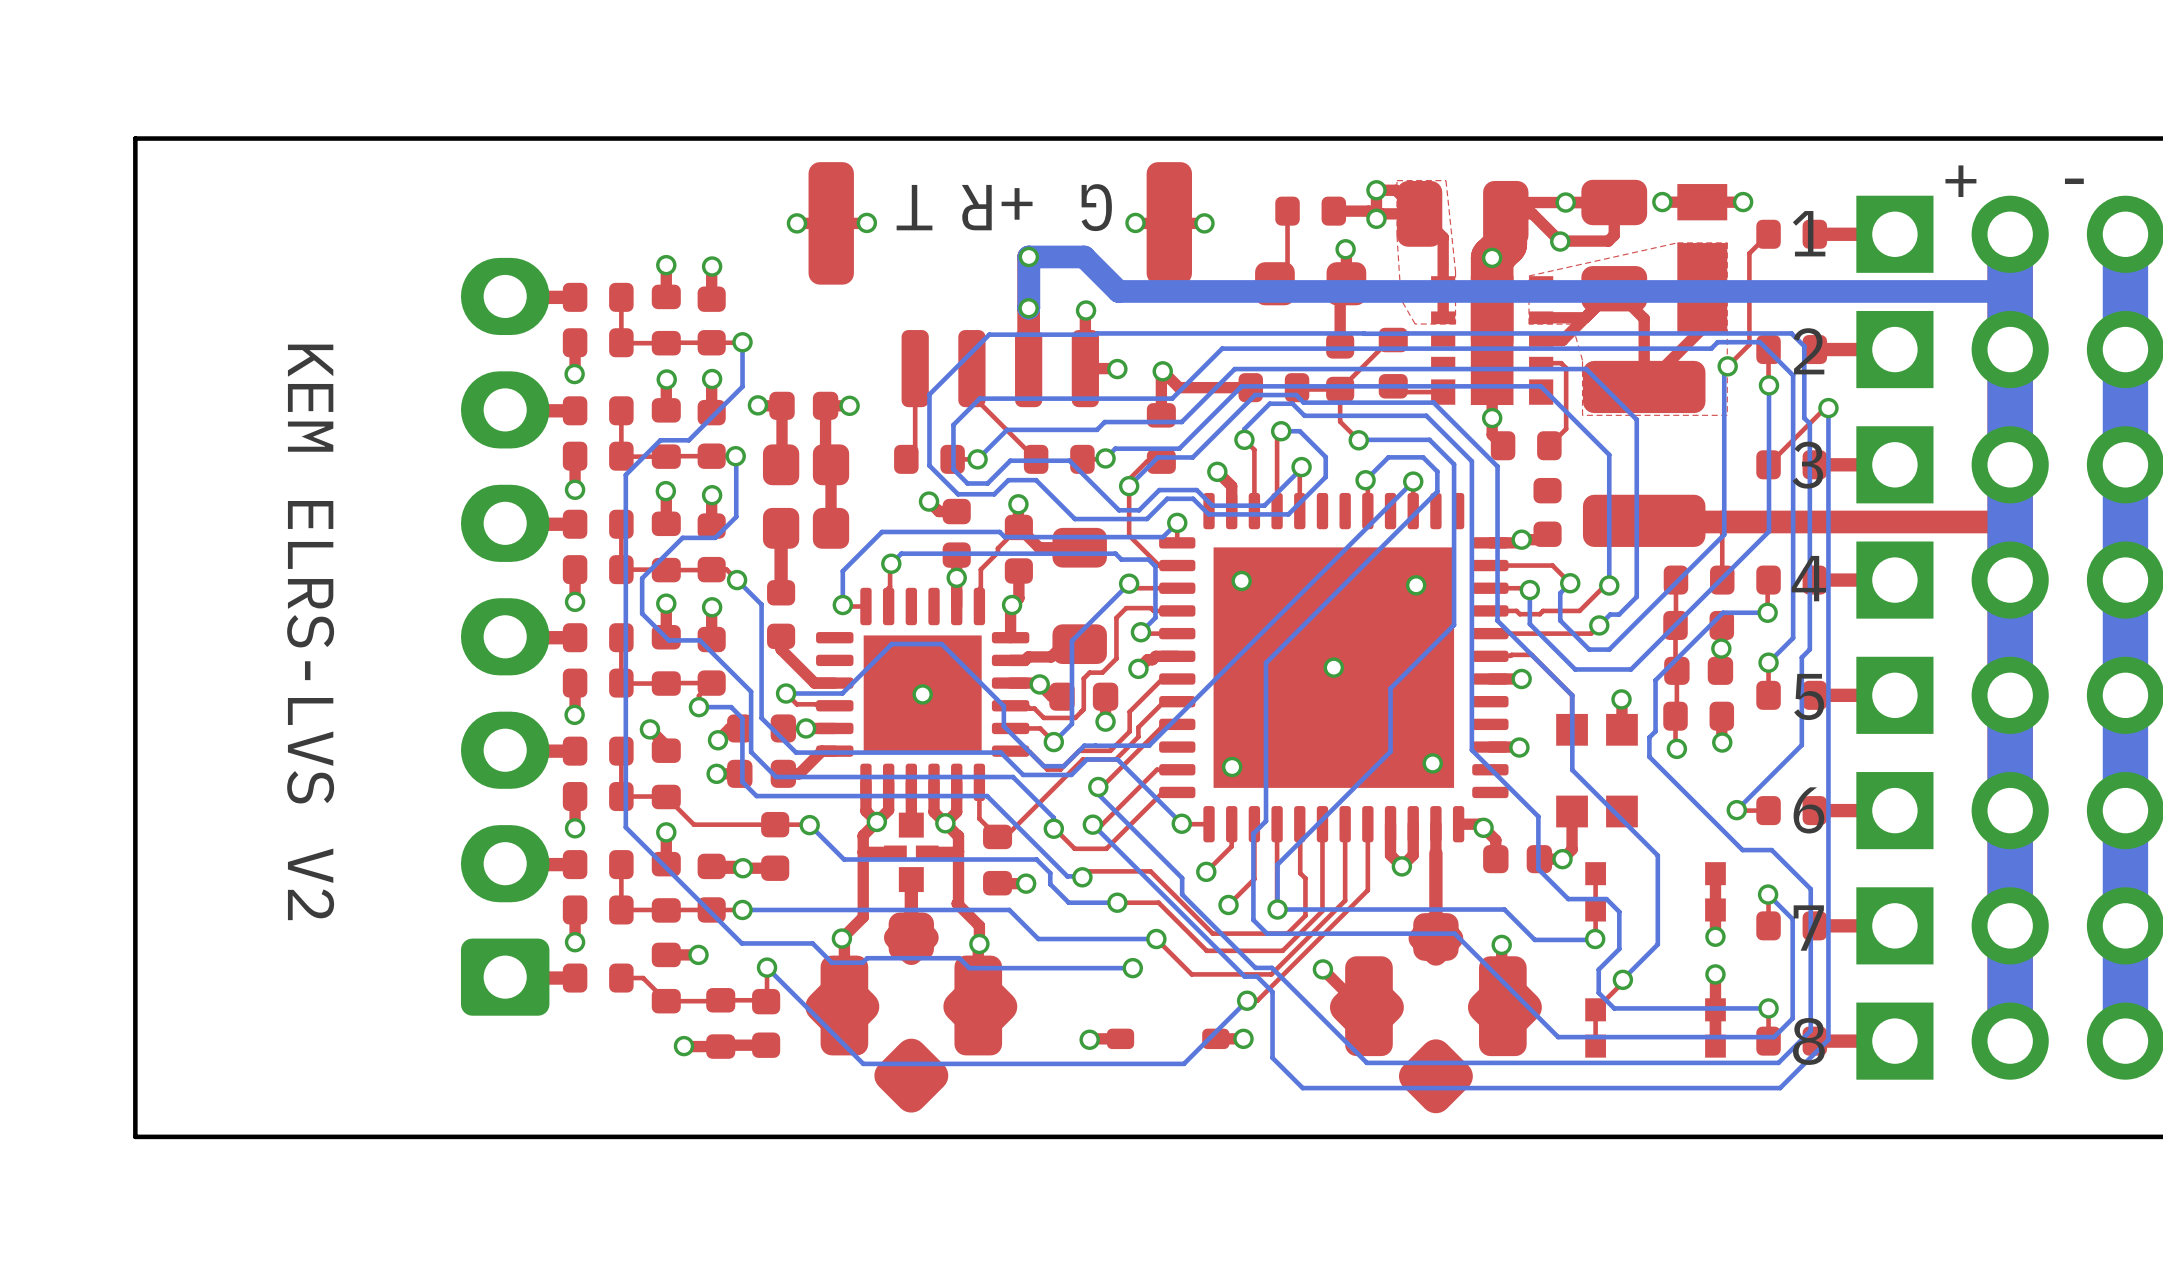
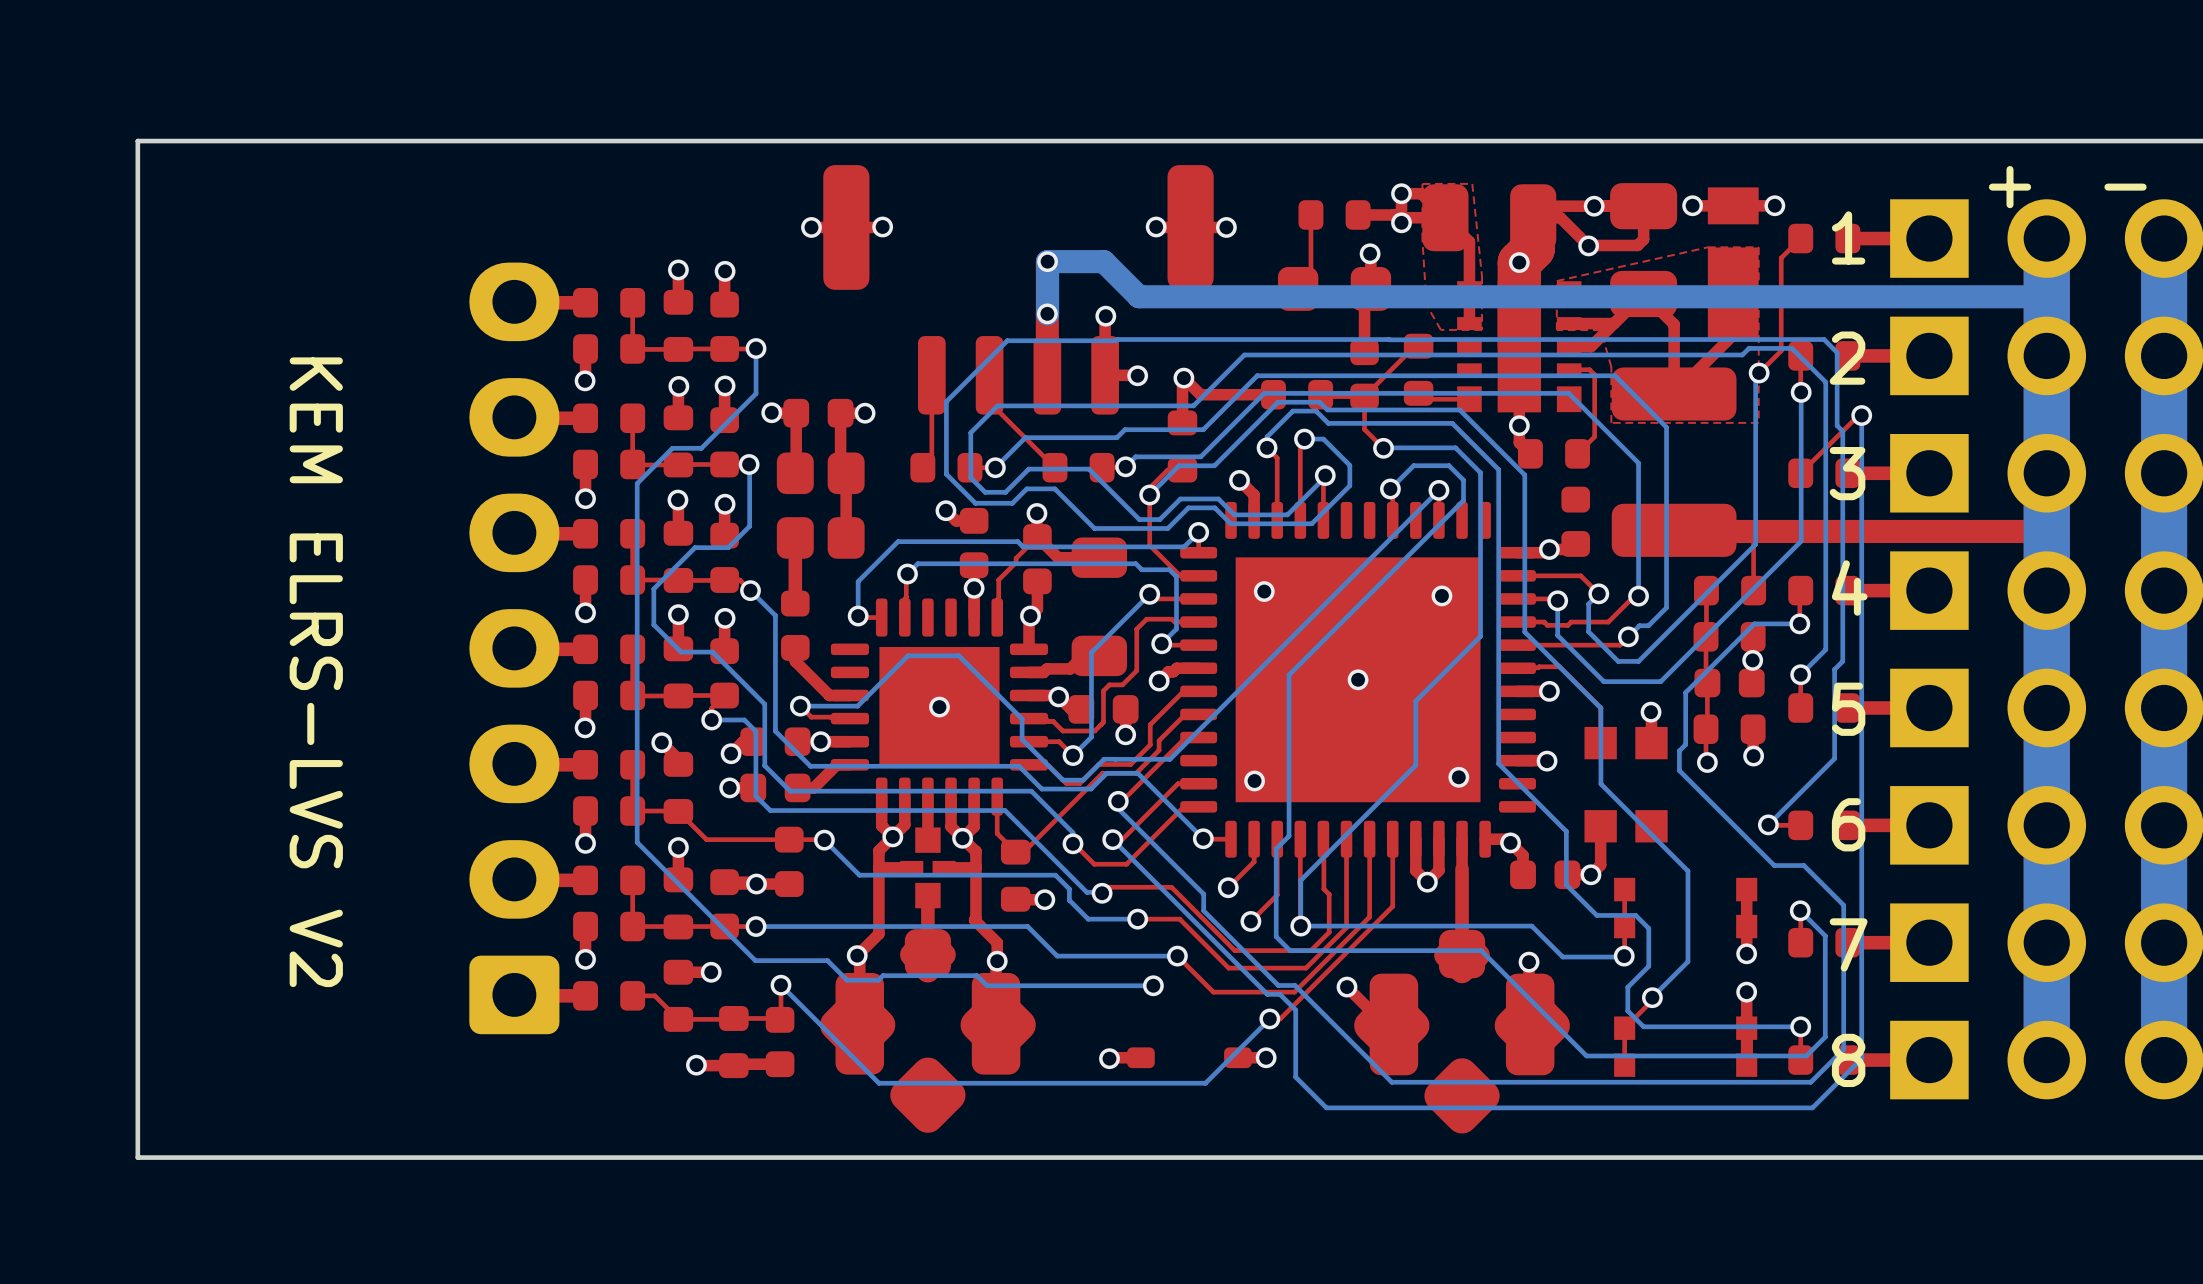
text: + (1017, 203) -> none
text: T (914, 207) -> none
text: R (976, 207) -> none
text: G (1096, 207) -> none

